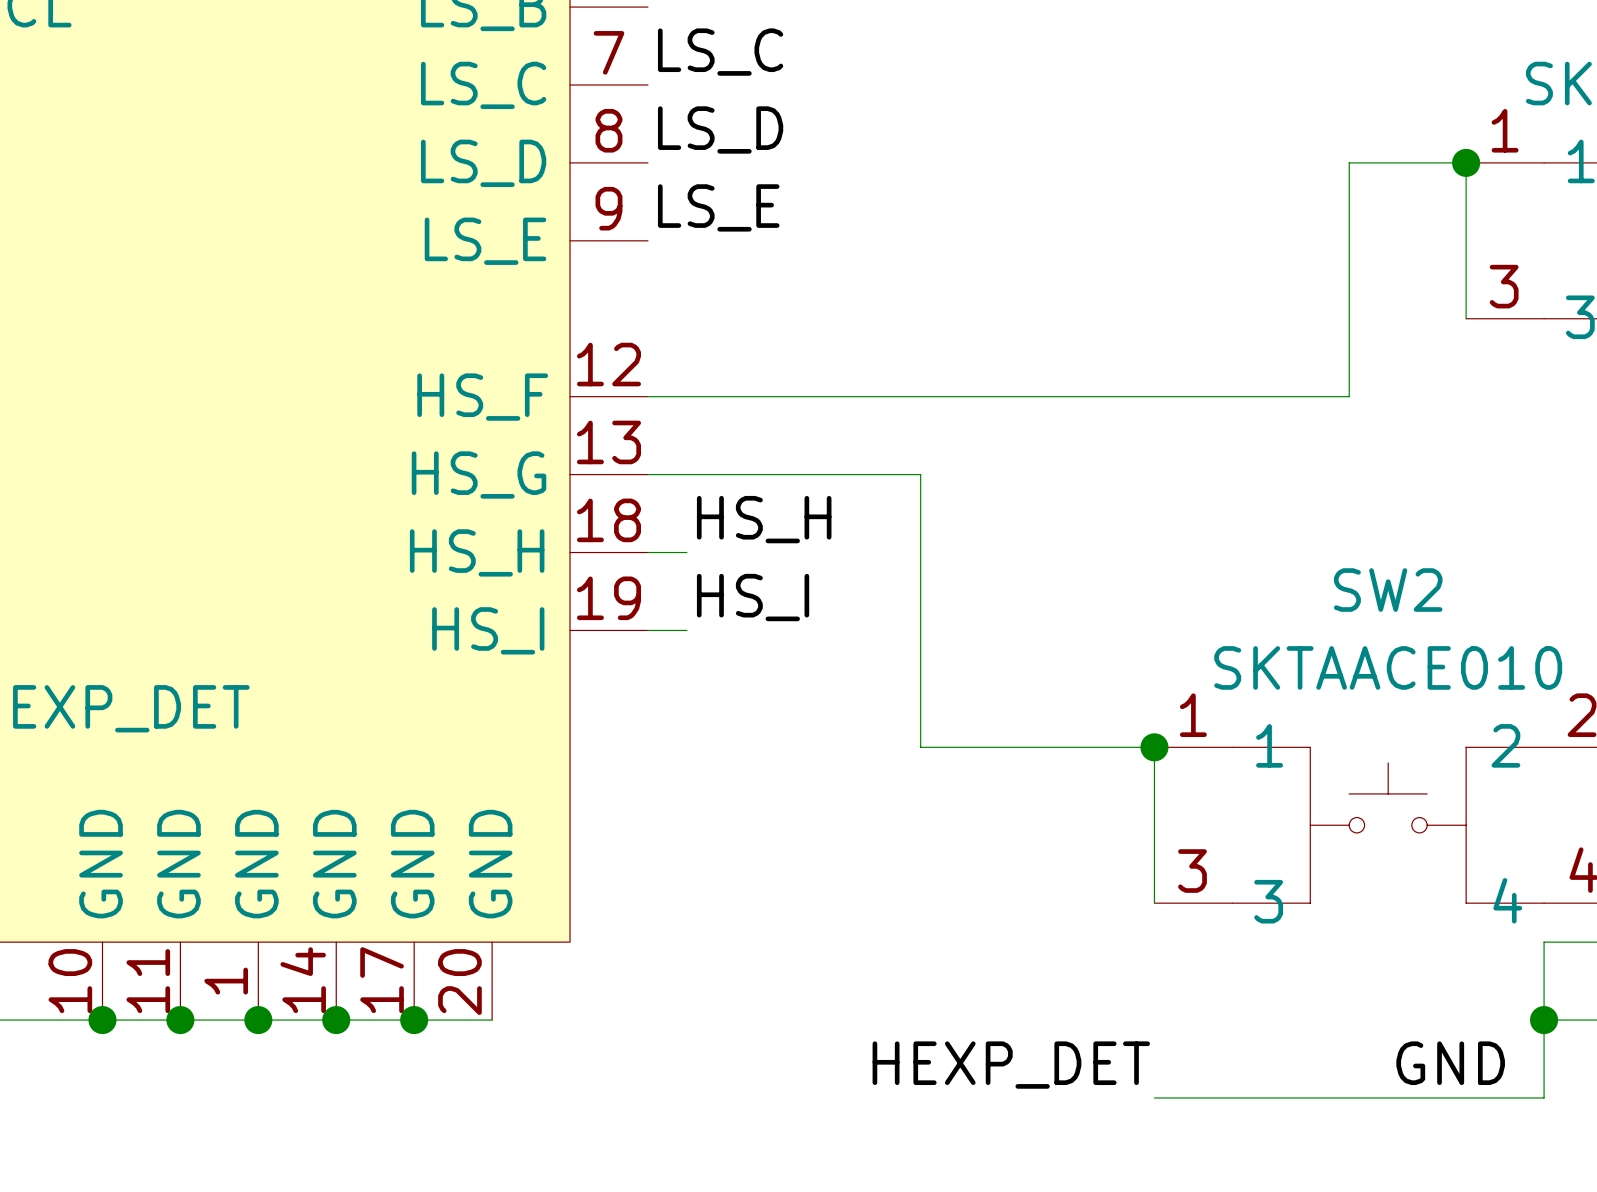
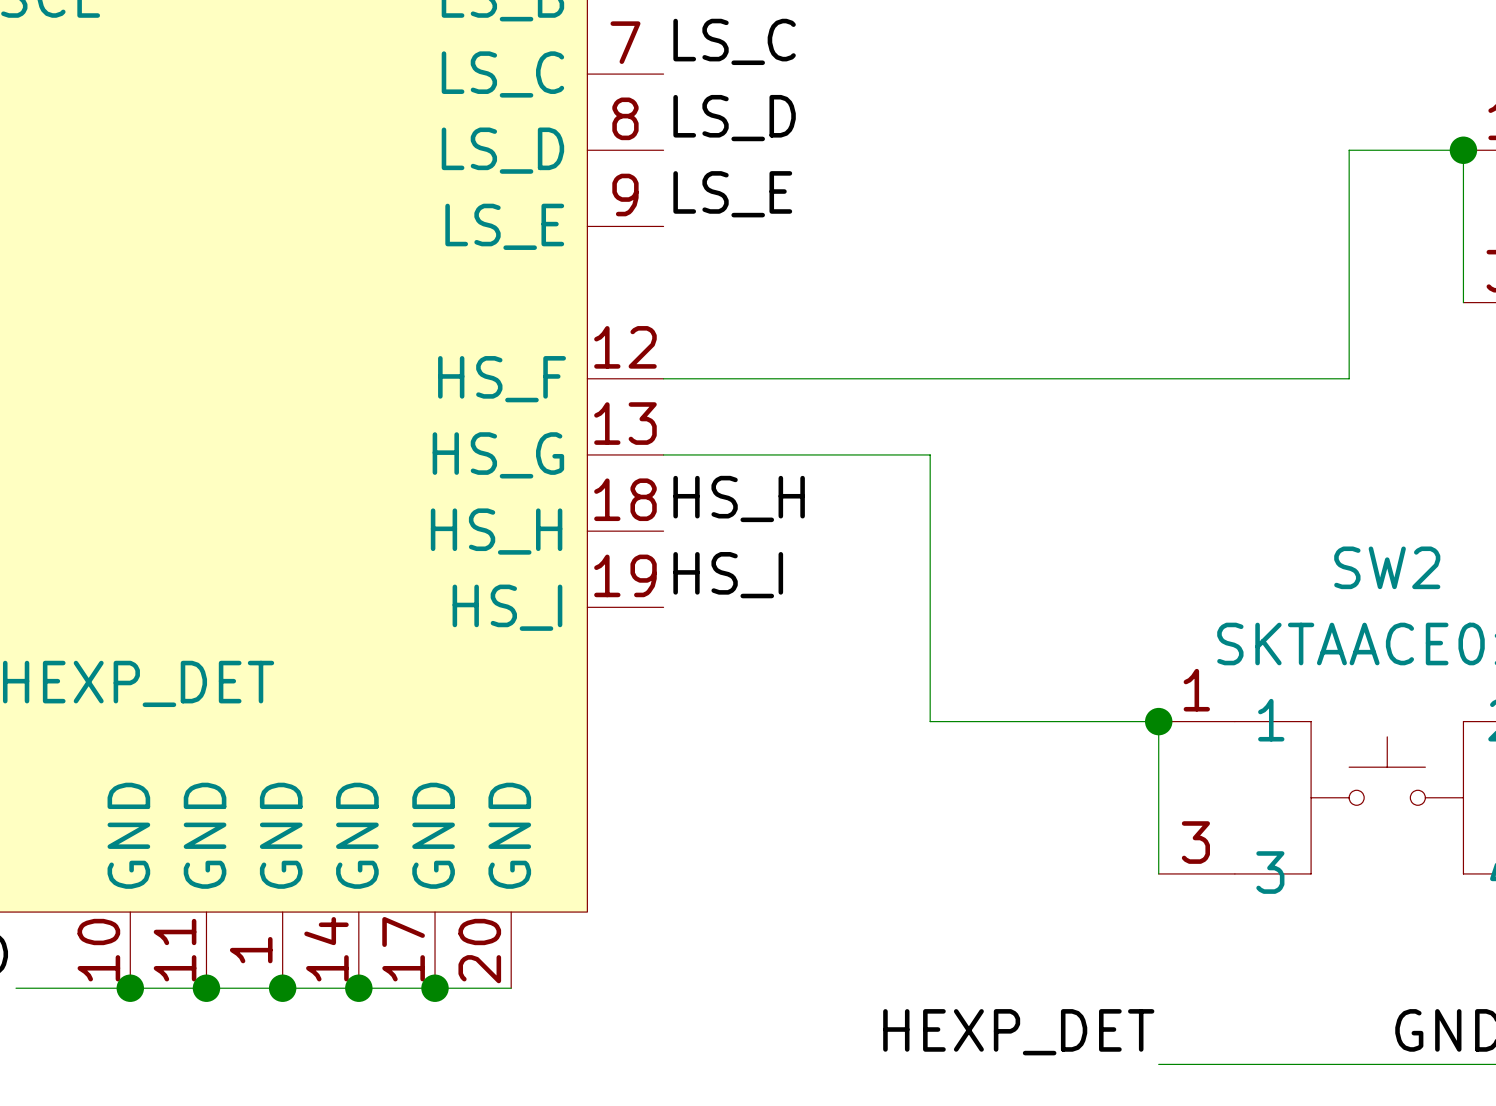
label position: HS_H (764, 519) -> HS_H (739, 498)
wire: (647, 552) (686, 552) -> none
label position: HS_I (753, 597) -> HS_I (728, 575)
wire: (647, 630) (686, 630) -> none

